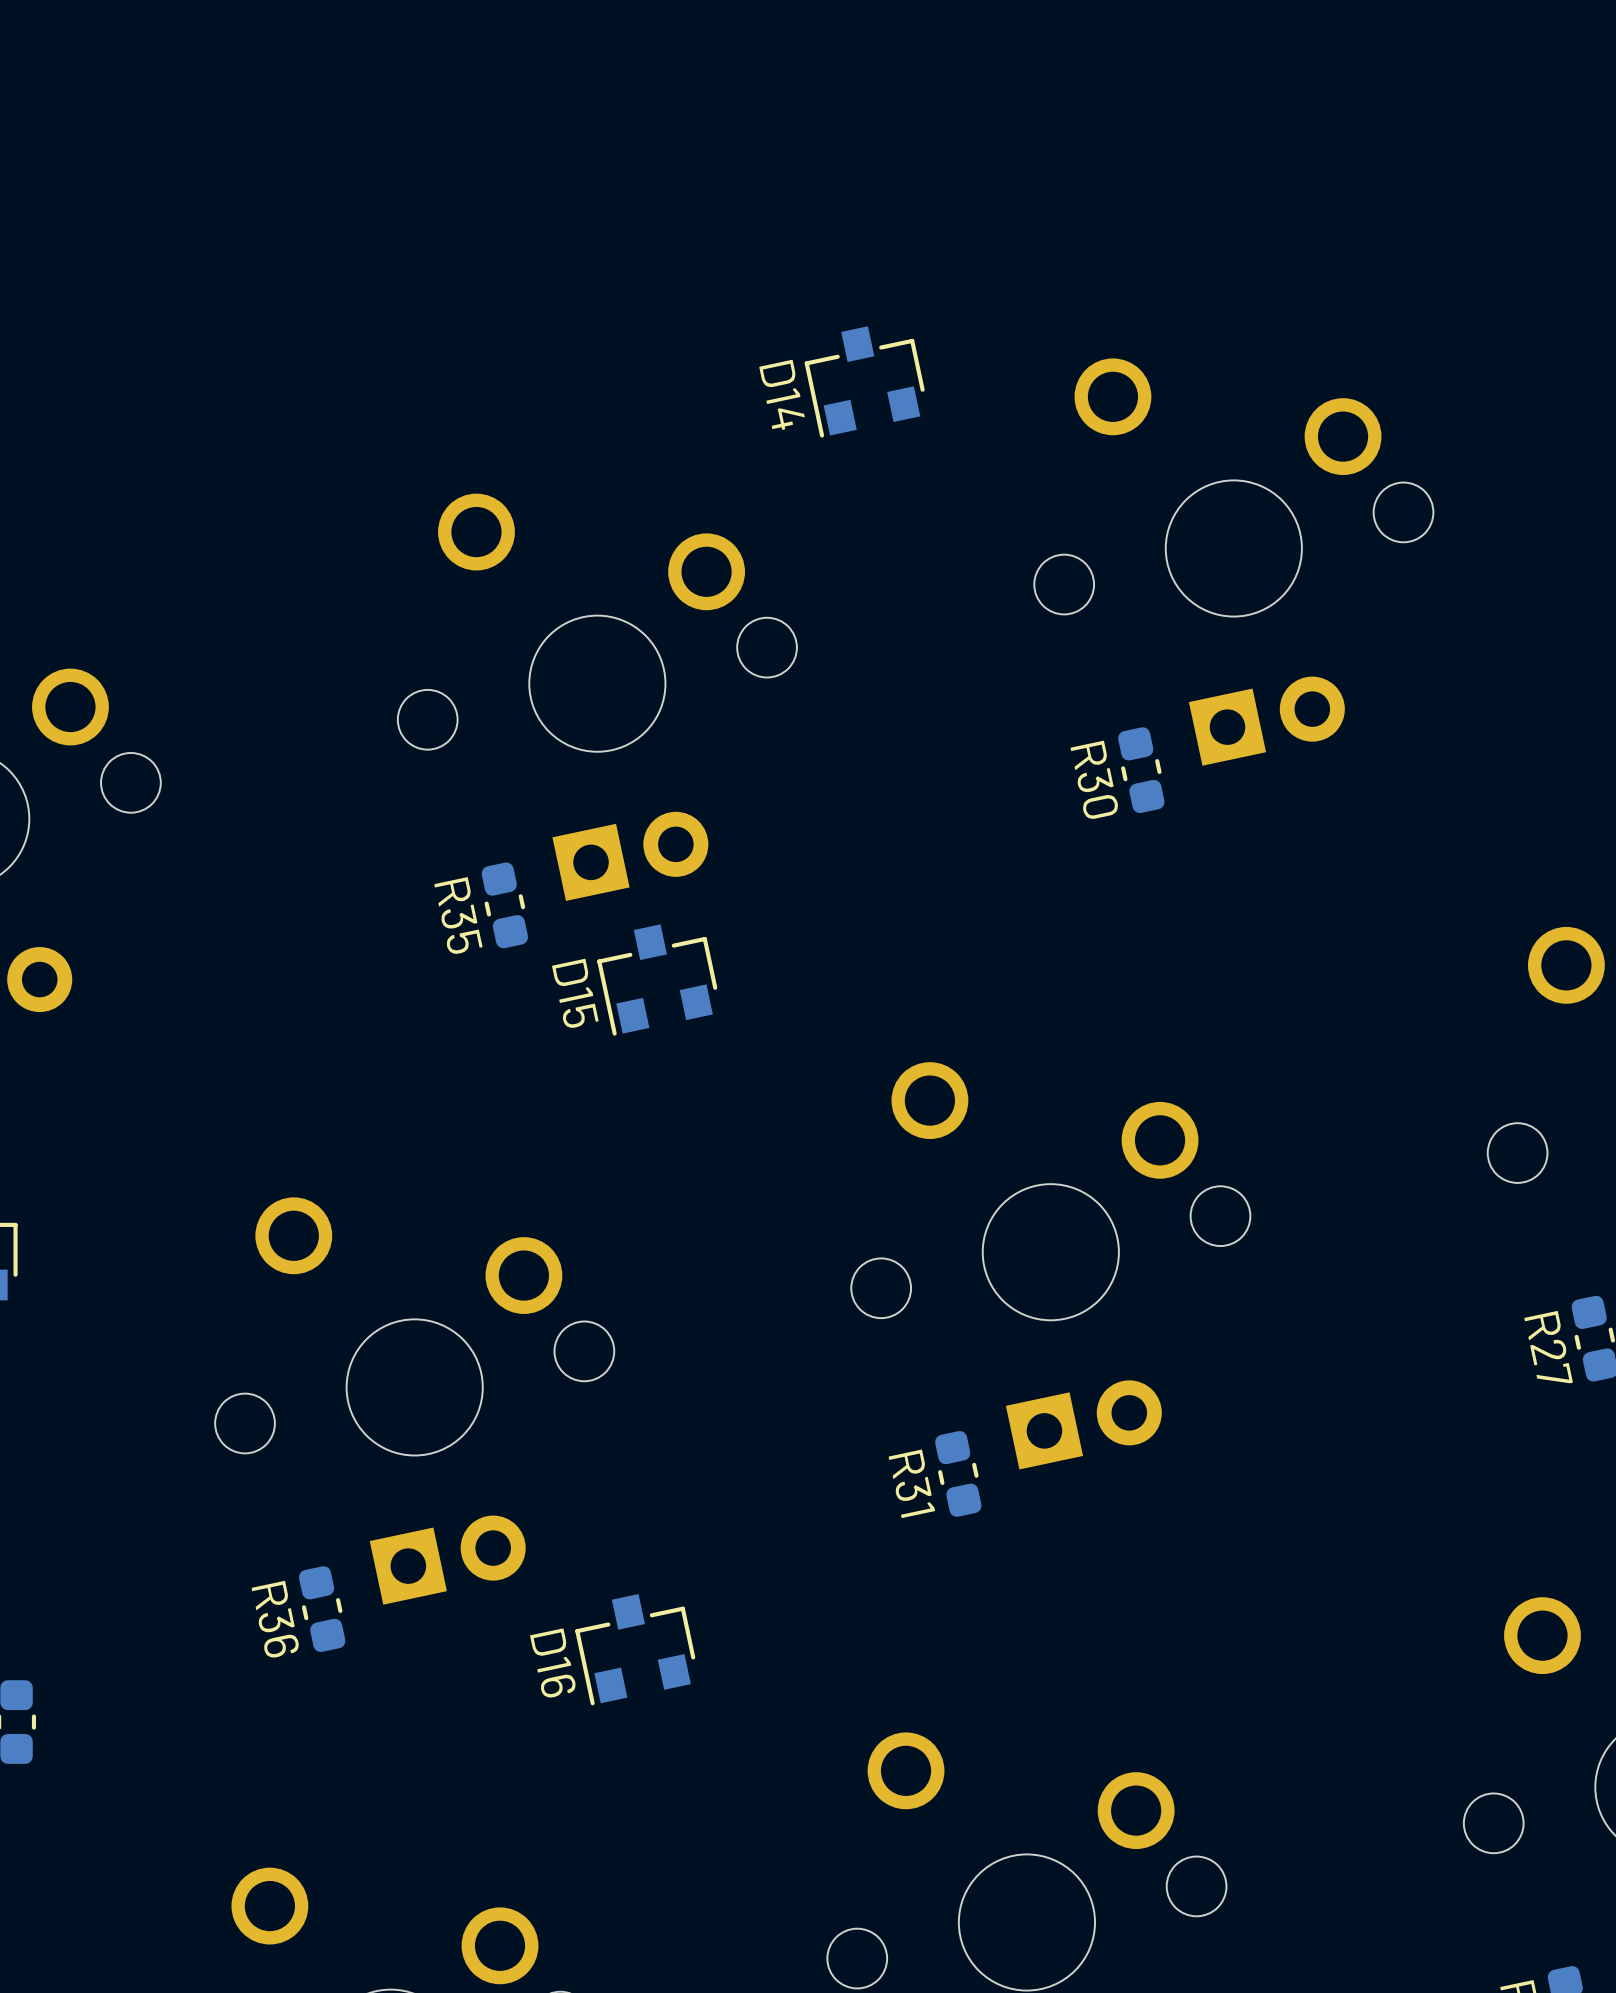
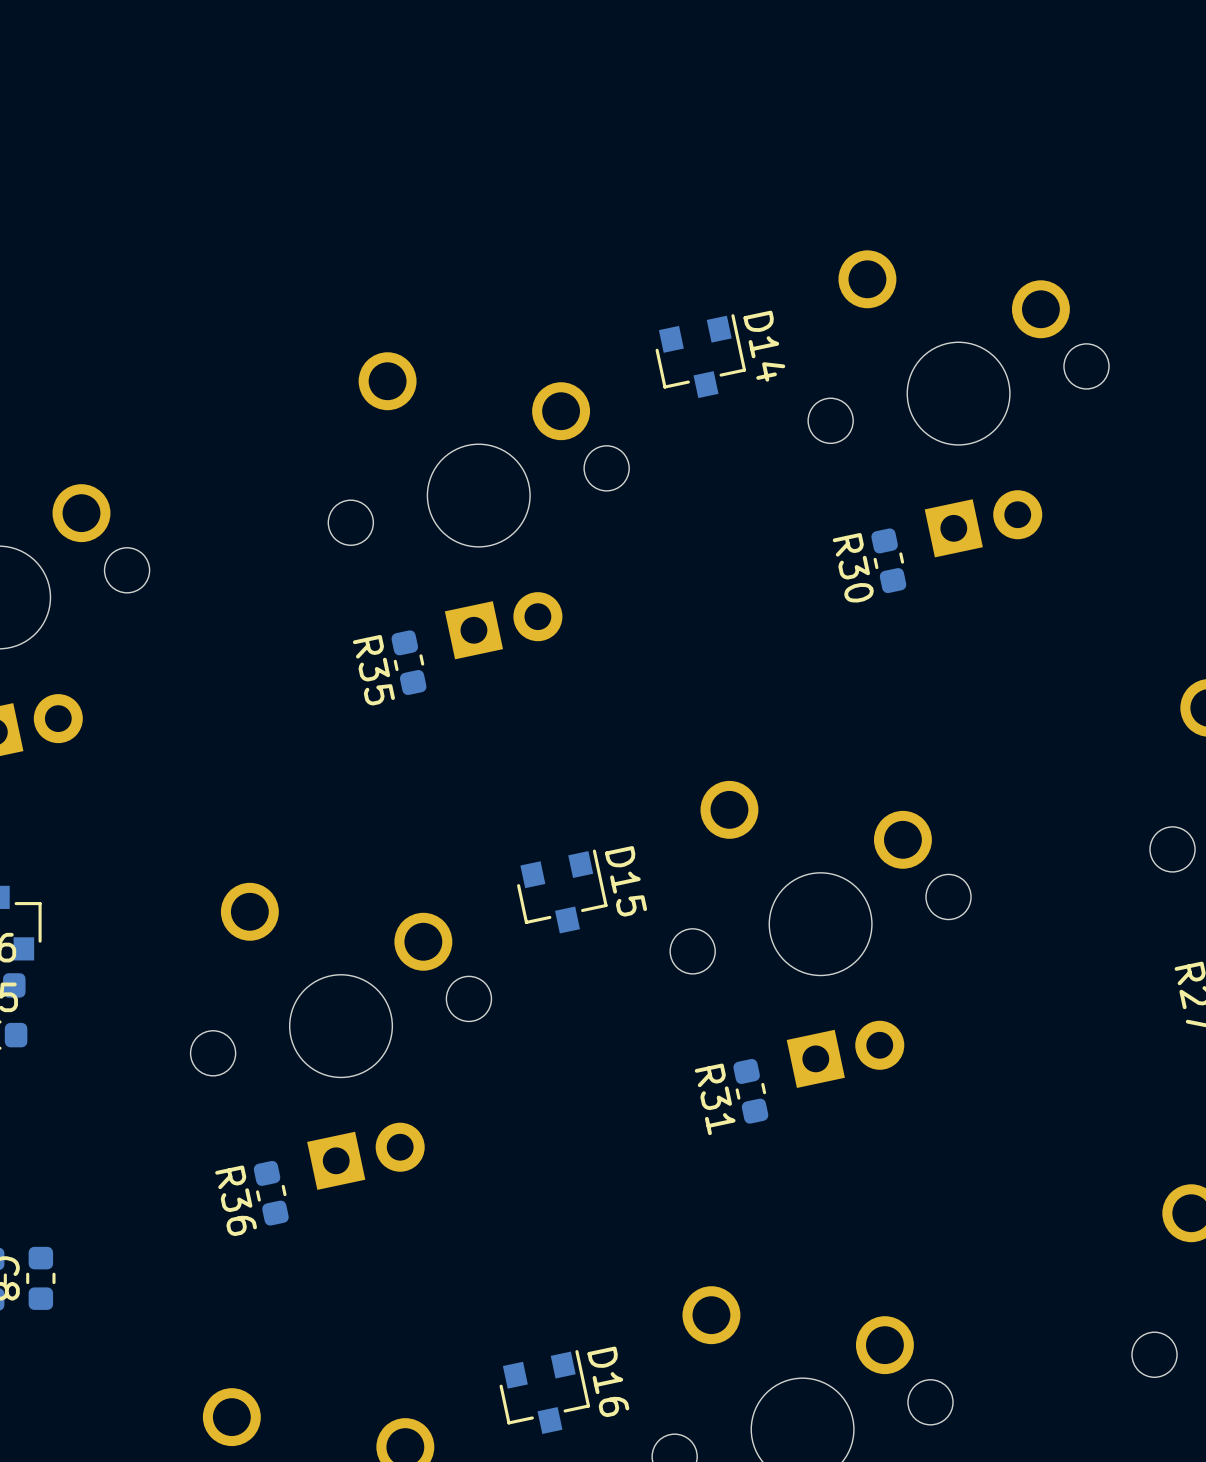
D14 rotation: 0° (864, 381) -> 180° (700, 356)
D14 position: (864, 381) -> (700, 356)
D15 rotation: 0° (657, 979) -> 180° (562, 891)
D15 position: (657, 979) -> (562, 891)
D16 rotation: 0° (635, 1649) -> 180° (544, 1392)
D16 position: (635, 1649) -> (544, 1392)

